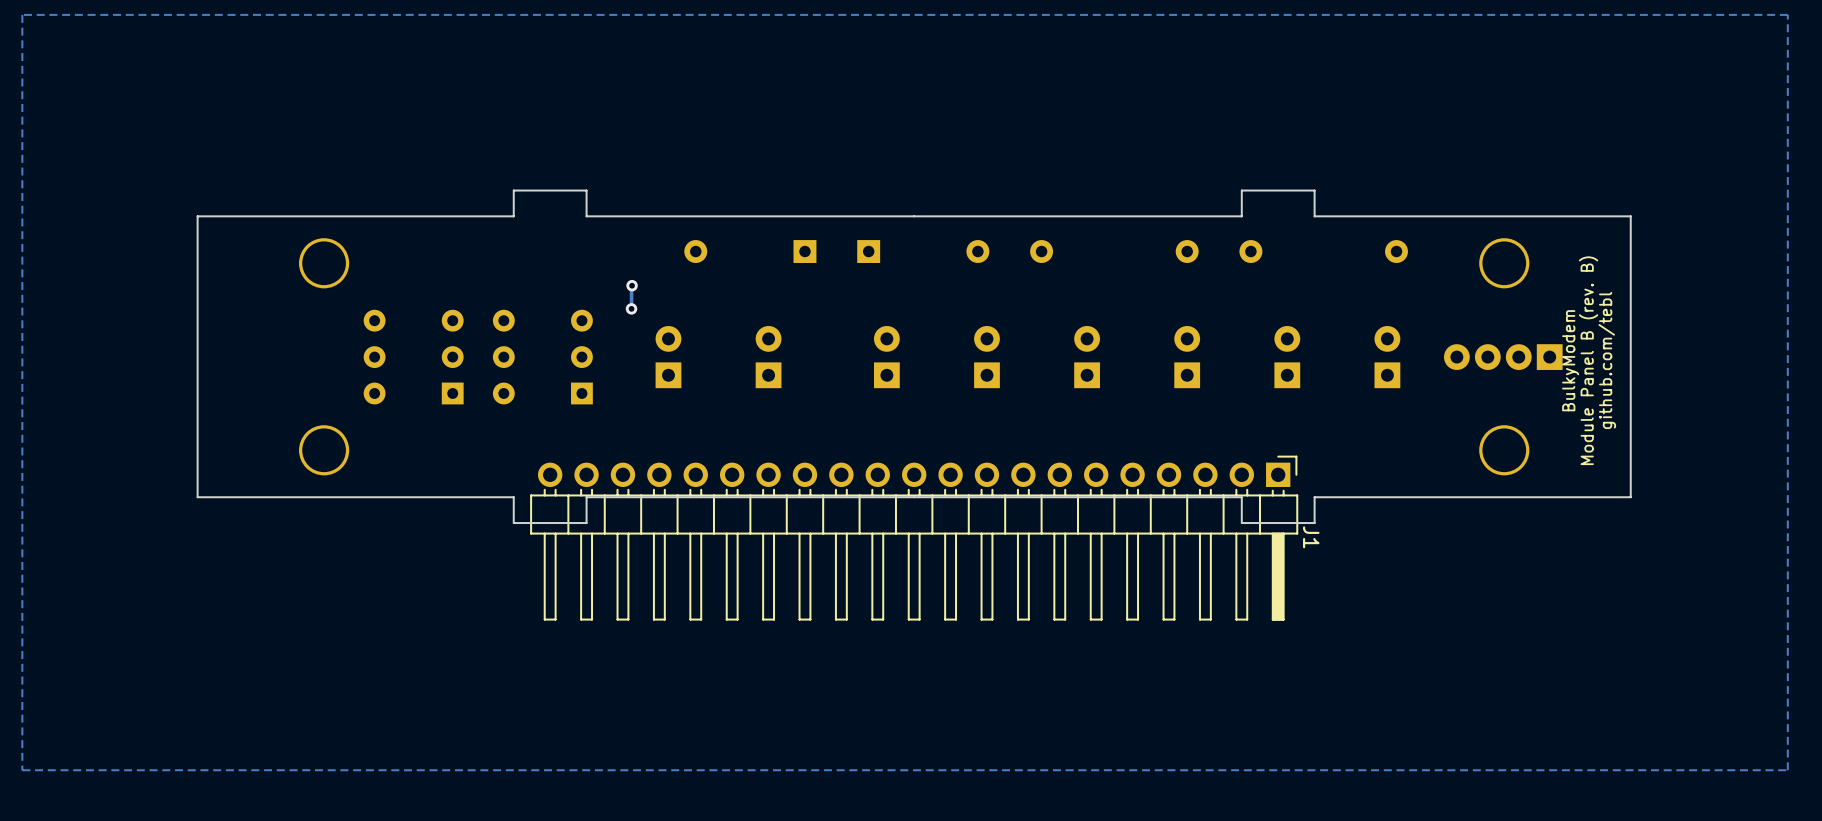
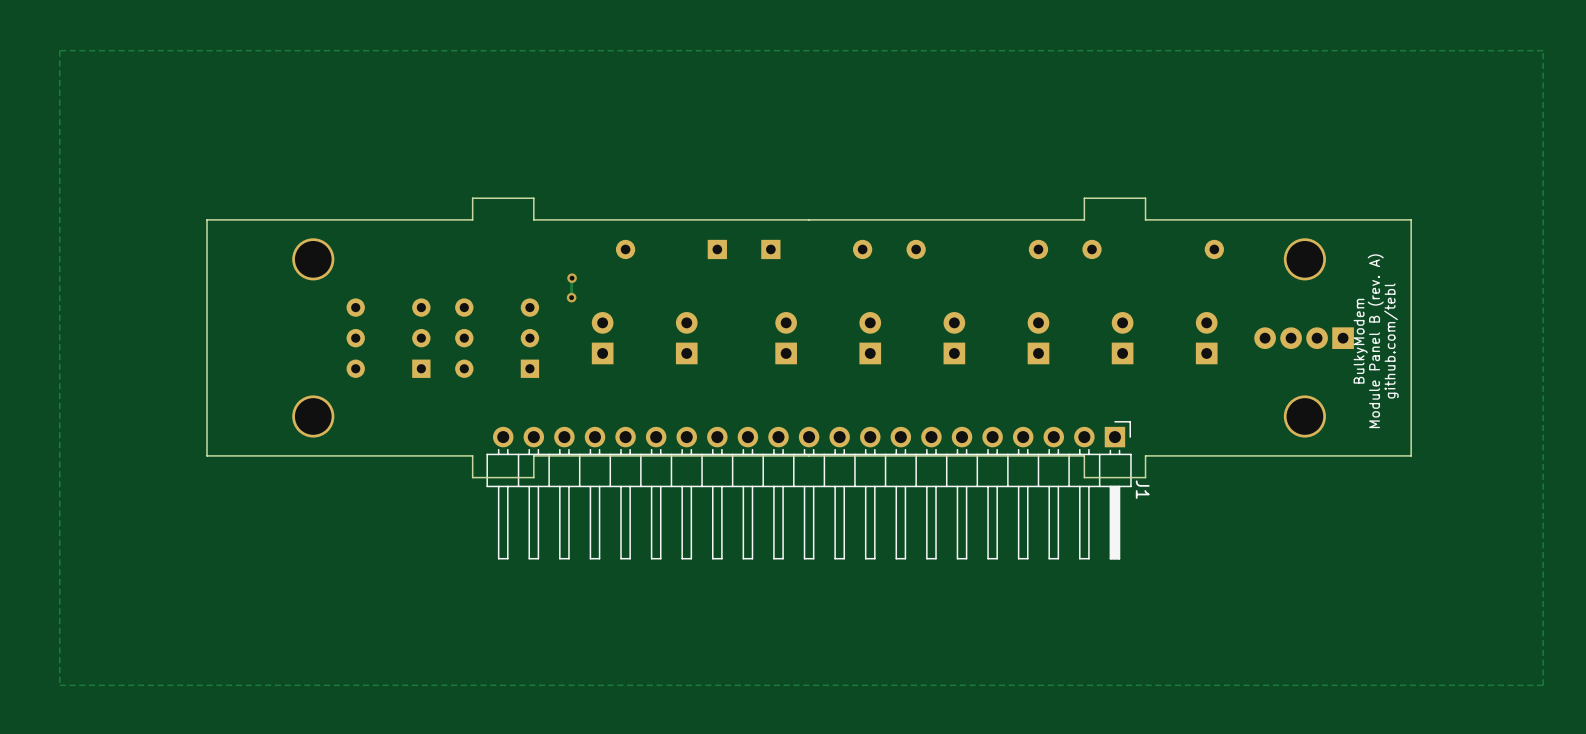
text: Module Panel B (rev. B) (1588, 360) -> Module Panel B (rev. A) (1375, 341)

